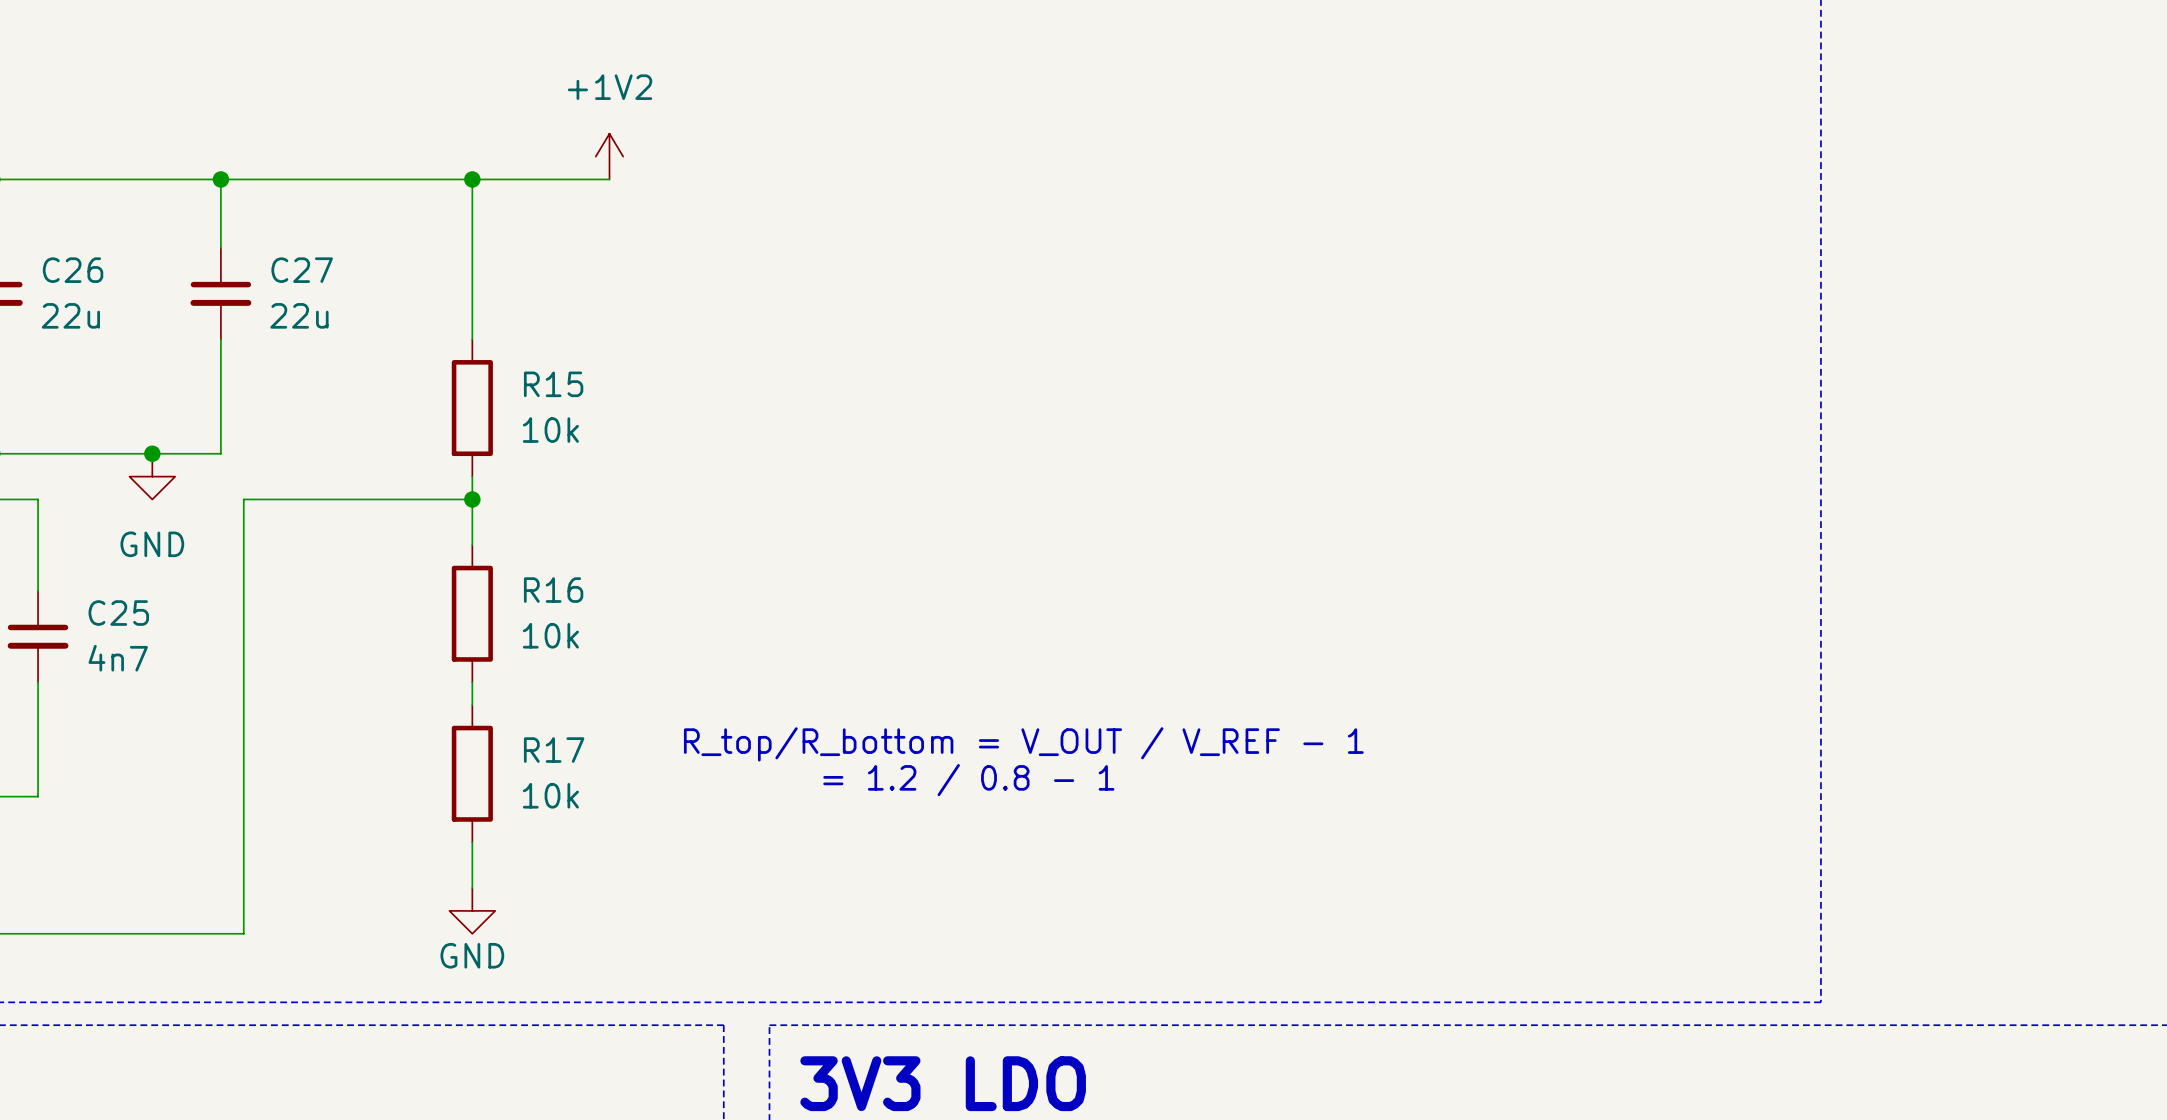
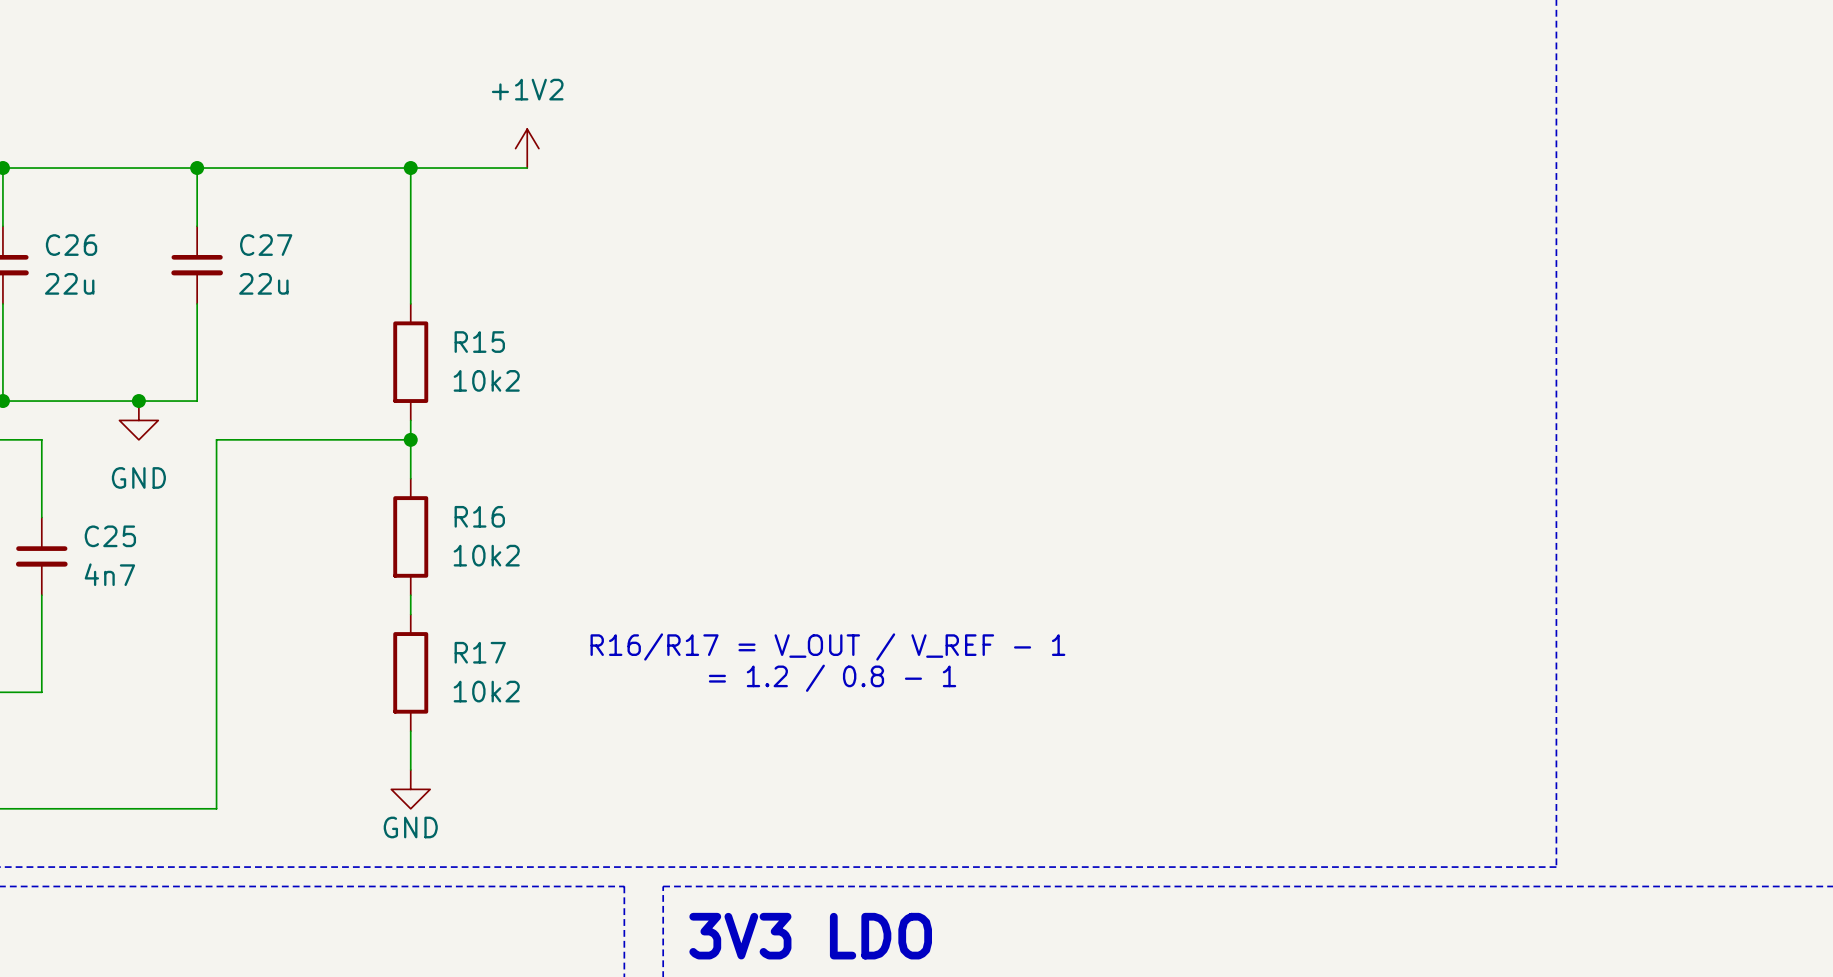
R15 value: 10k (550, 430) -> 10k2 (486, 380)
R16 value: 10k (550, 635) -> 10k2 (486, 555)
text: R_top/R_bottom = V_OUT / V_REF - 1 (1023, 744) -> R16/R17 = V_OUT / V_REF - 1 (827, 646)
R17 value: 10k (550, 795) -> 10k2 (486, 691)

